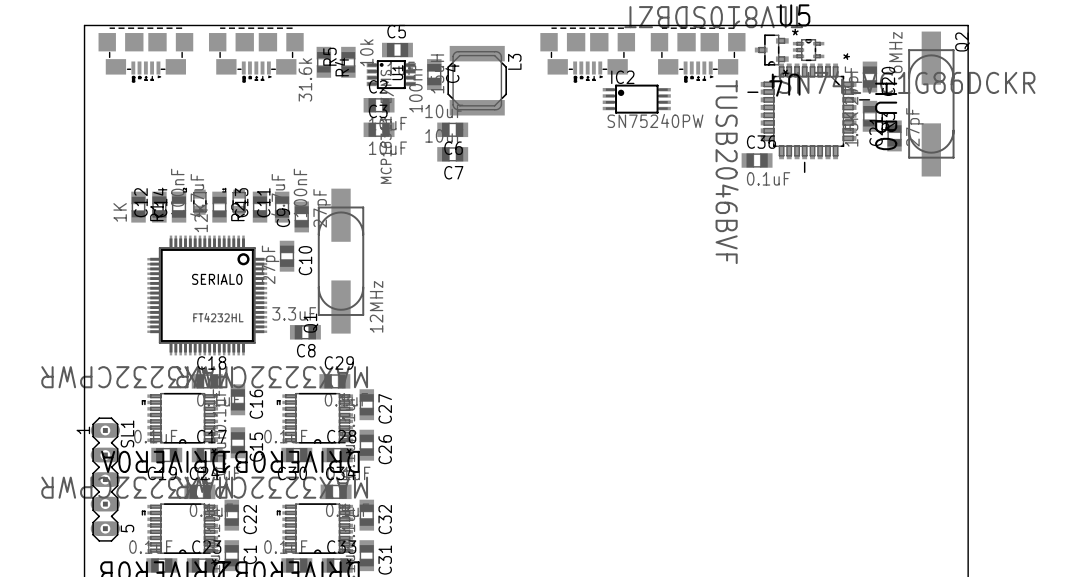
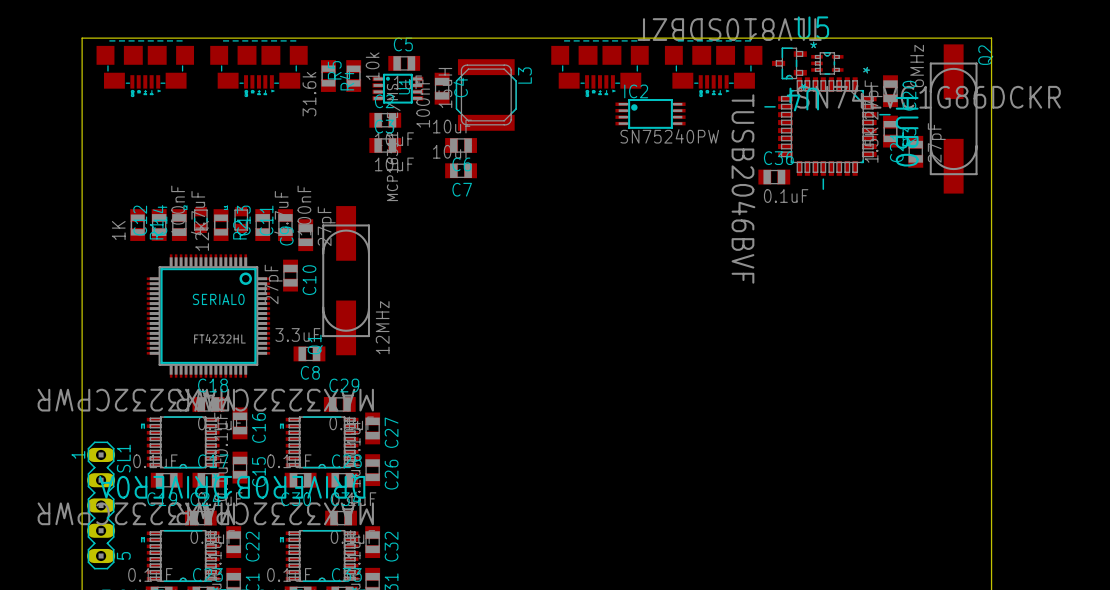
SL1 footprint: [90, 417, 121, 542] -> [86, 441, 116, 570]

